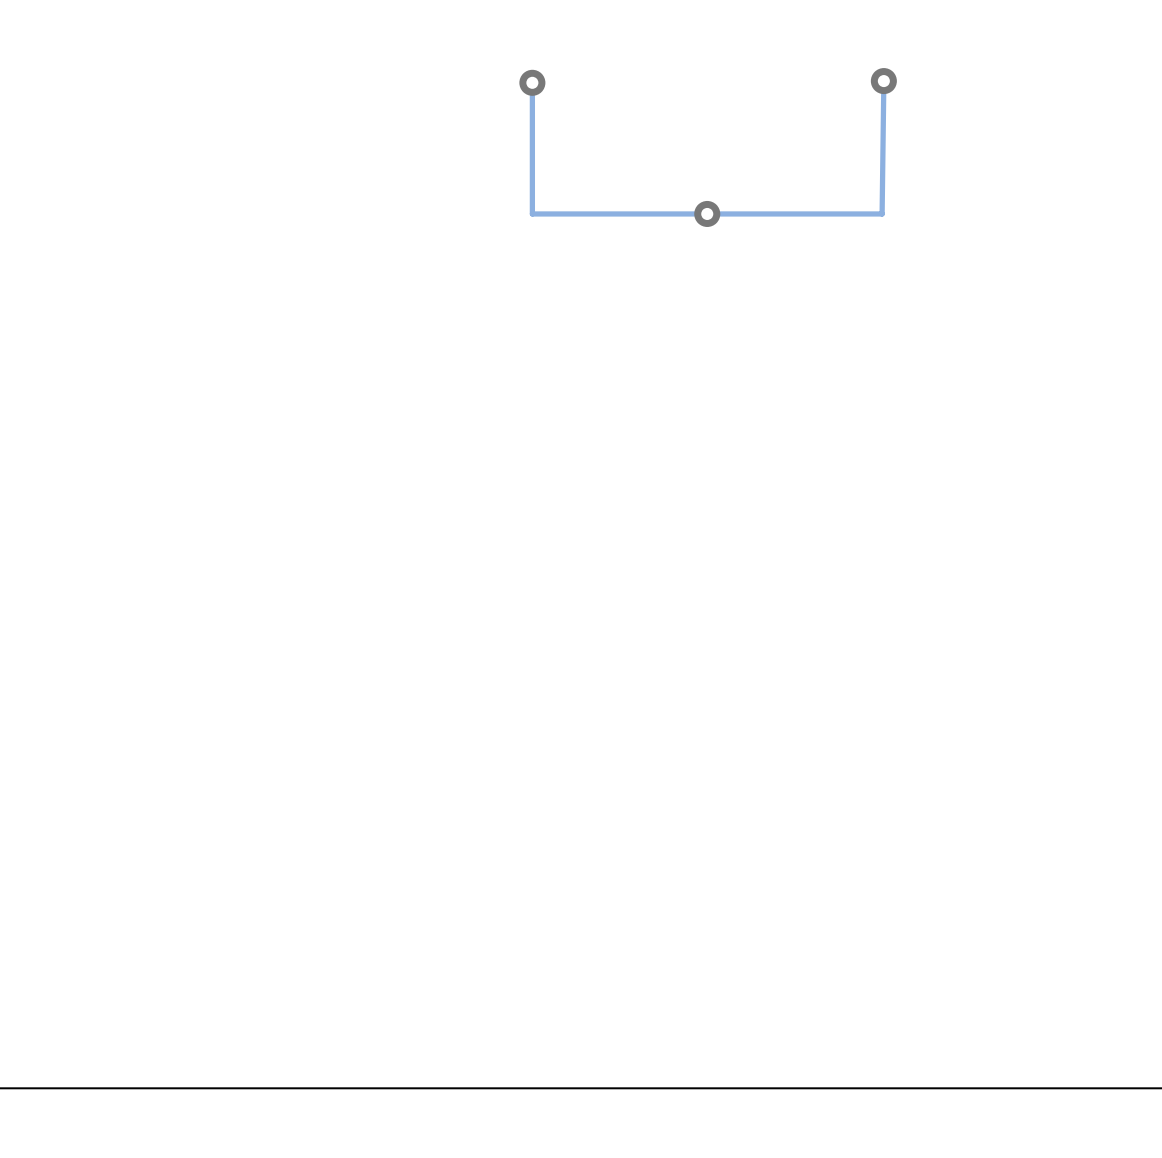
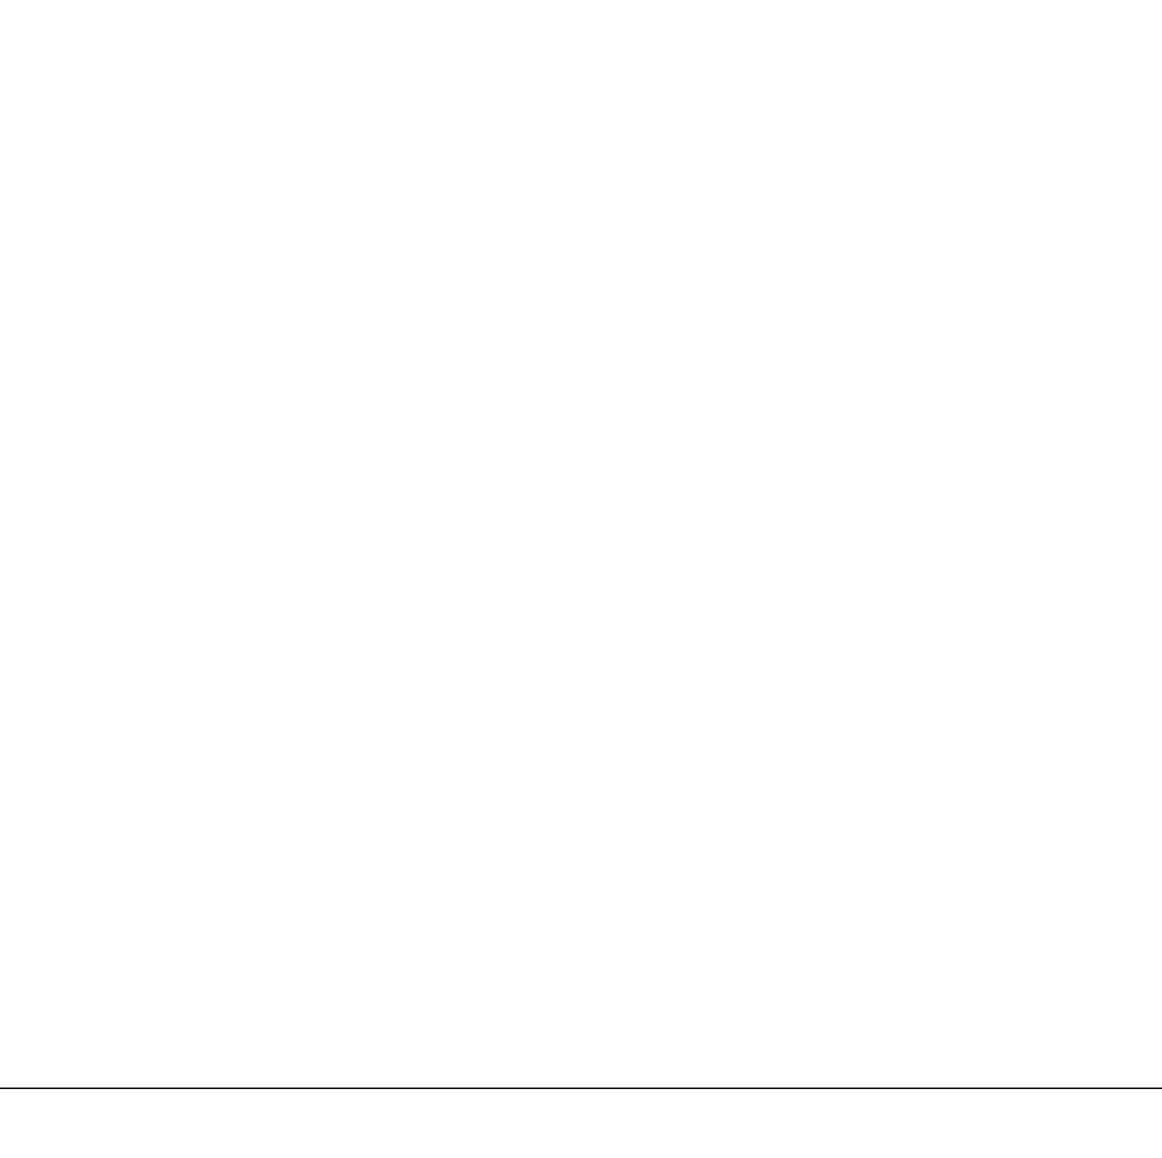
track: (883, 81) (882, 213) (532, 213) (532, 82) -> none
via: (883, 81) -> none
via: (532, 82) -> none
via: (707, 213) -> none

